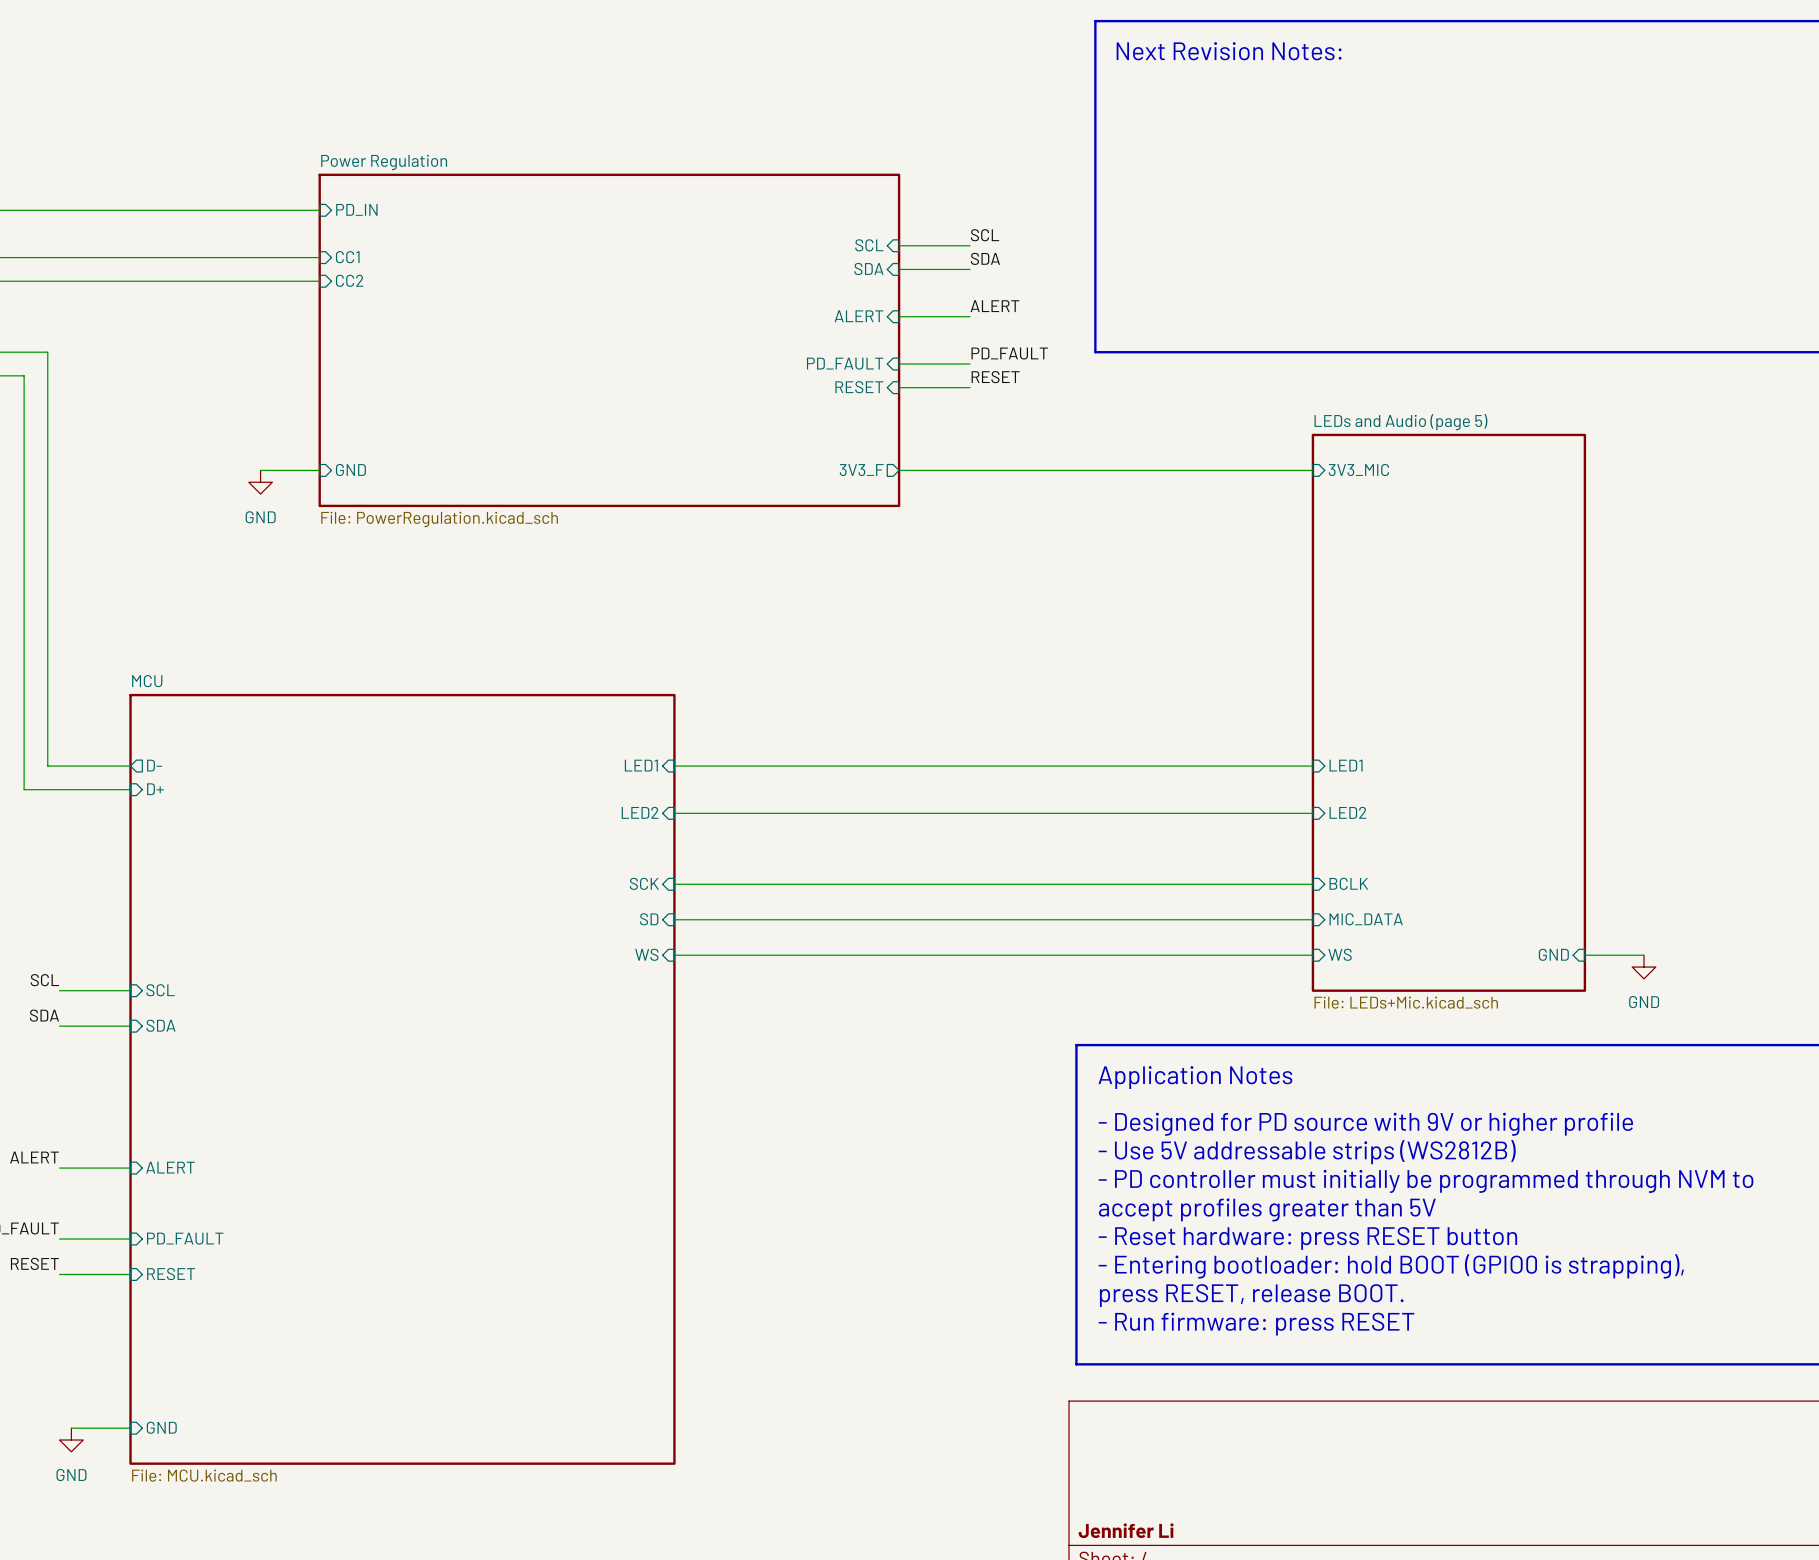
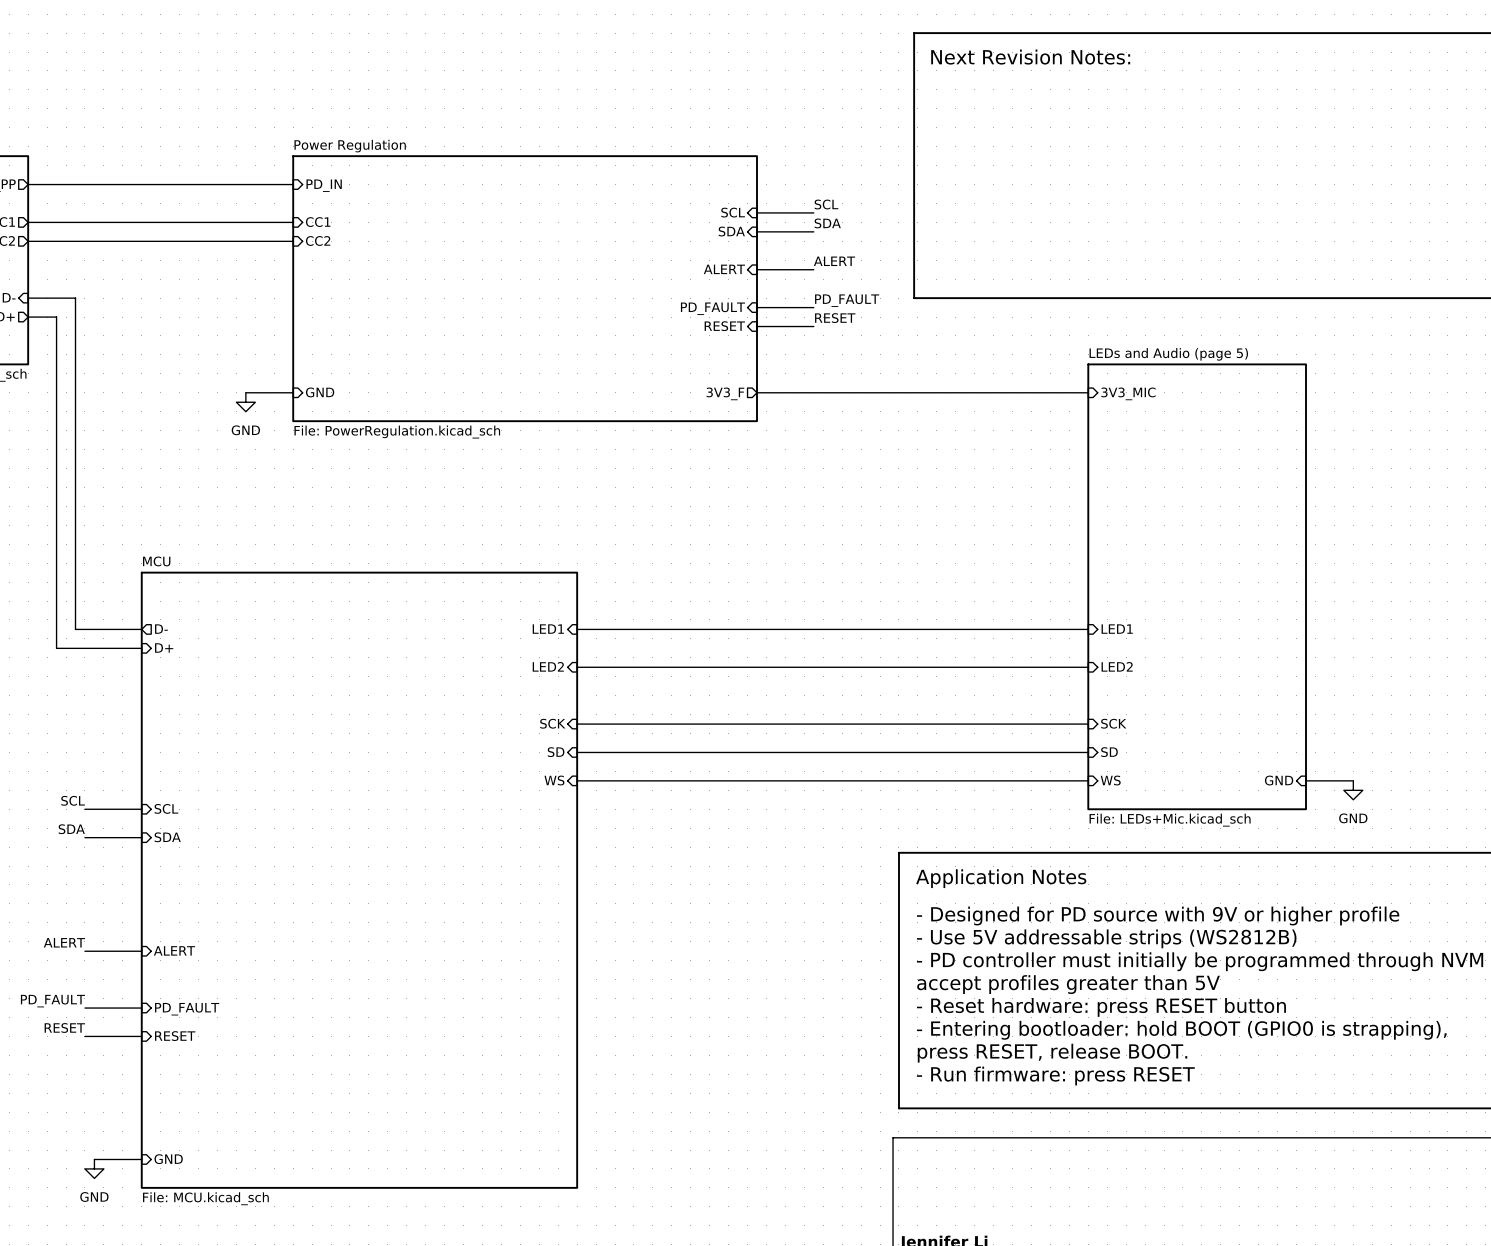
sheet pin: BCLK (1348, 883) -> SCK (1113, 723)
sheet pin: MIC_DATA (1366, 919) -> SD (1109, 752)

